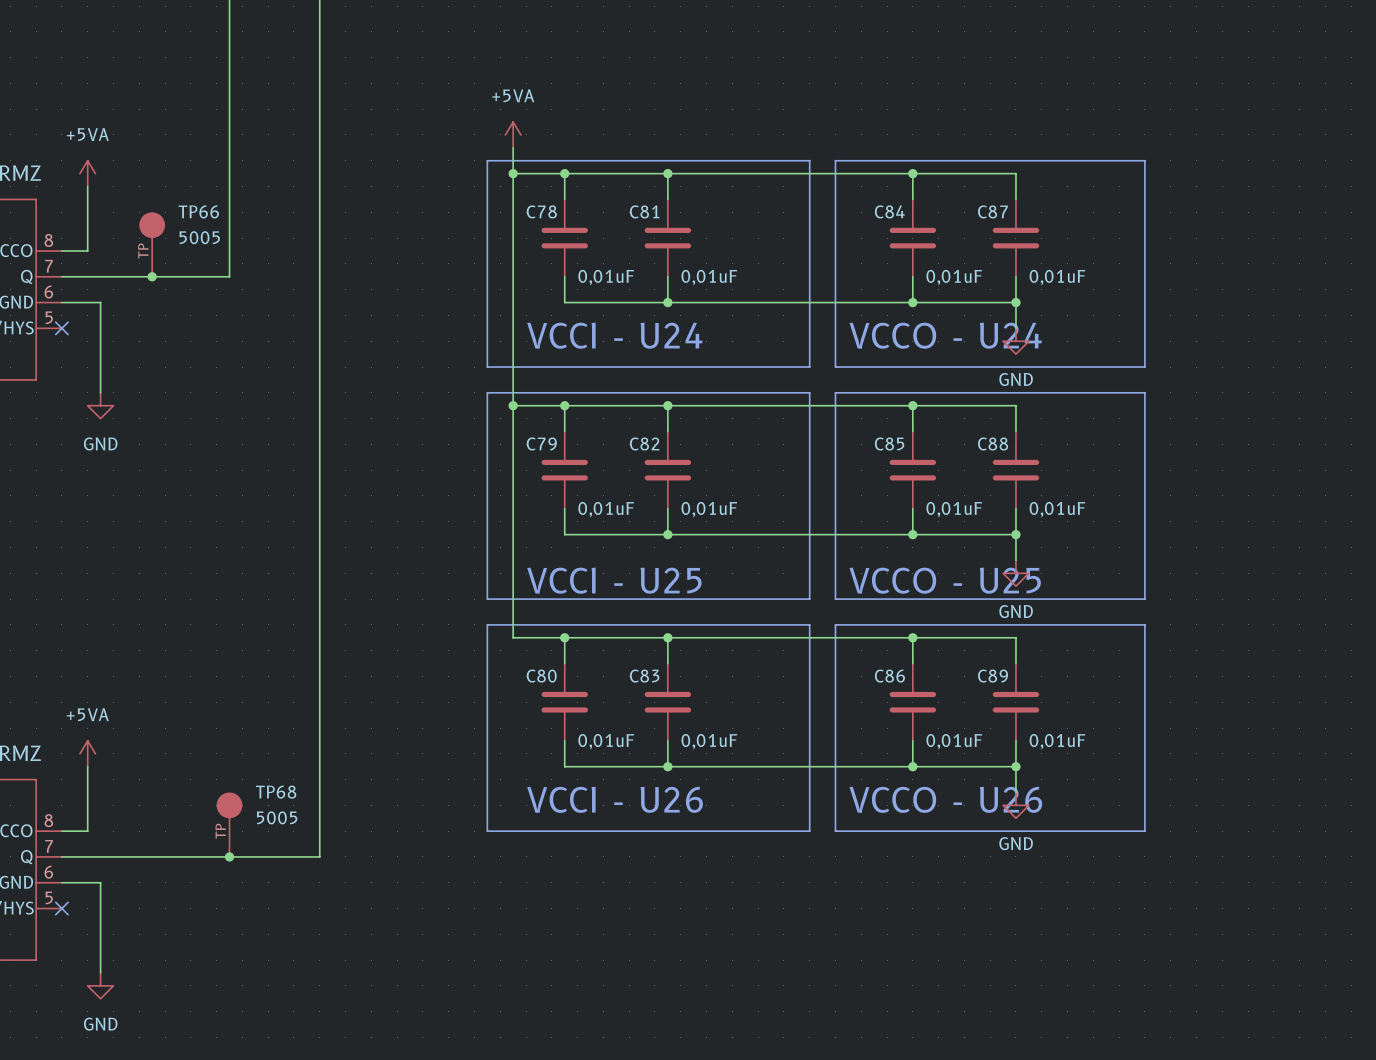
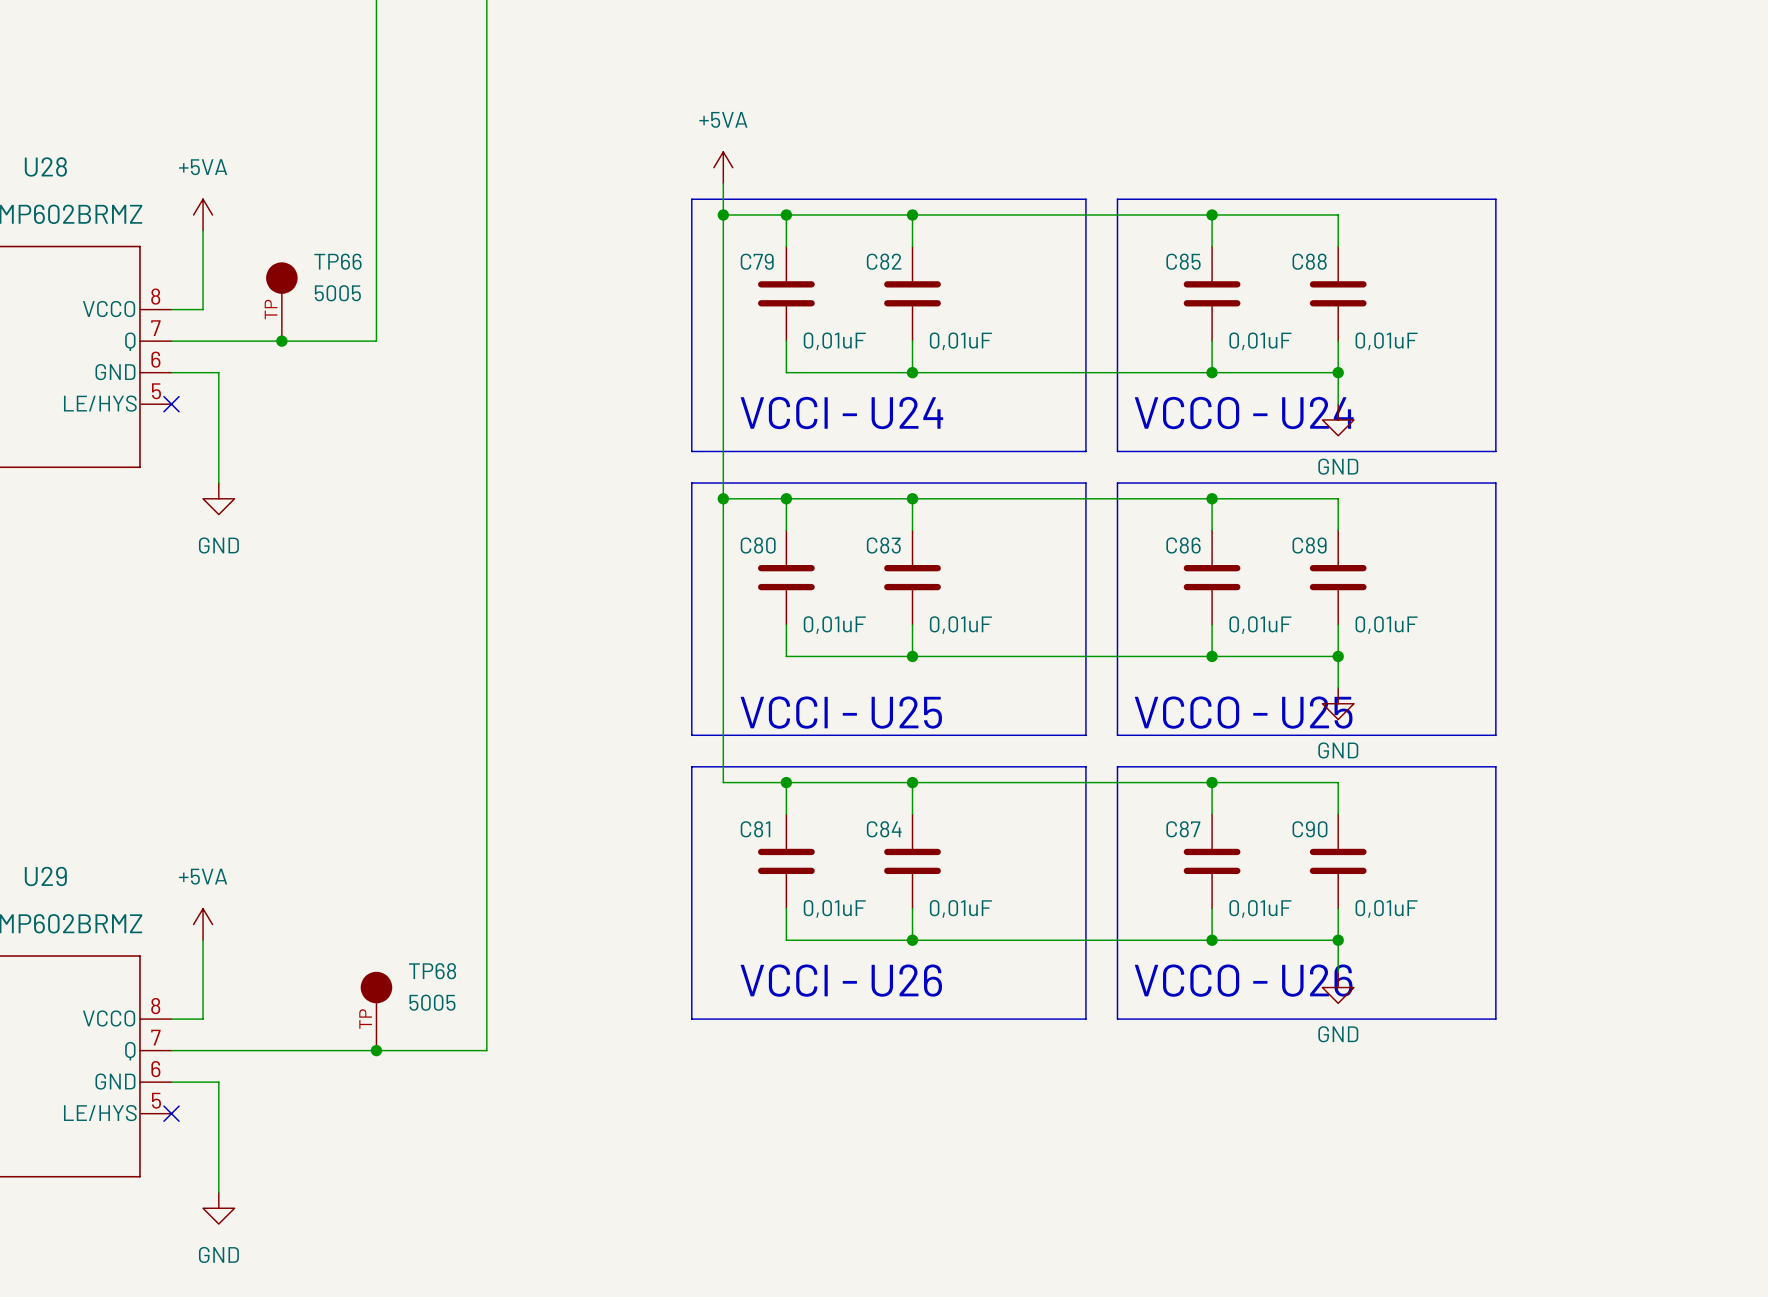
C78 name: C78 (541, 211) -> C79 (757, 261)
C81 name: C81 (644, 211) -> C82 (884, 261)
C84 name: C84 (889, 211) -> C85 (1183, 261)
C87 name: C87 (992, 211) -> C88 (1309, 261)
C79 name: C79 (541, 443) -> C80 (758, 545)
C82 name: C82 (644, 443) -> C83 (883, 545)
C85 name: C85 (889, 443) -> C86 (1183, 545)
C88 name: C88 (993, 443) -> C89 (1309, 545)
C80 name: C80 (541, 676) -> C81 (755, 829)
C83 name: C83 (644, 676) -> C84 (884, 829)
C86 name: C86 (889, 676) -> C87 (1183, 829)
C89 name: C89 (993, 676) -> C90 (1309, 829)

